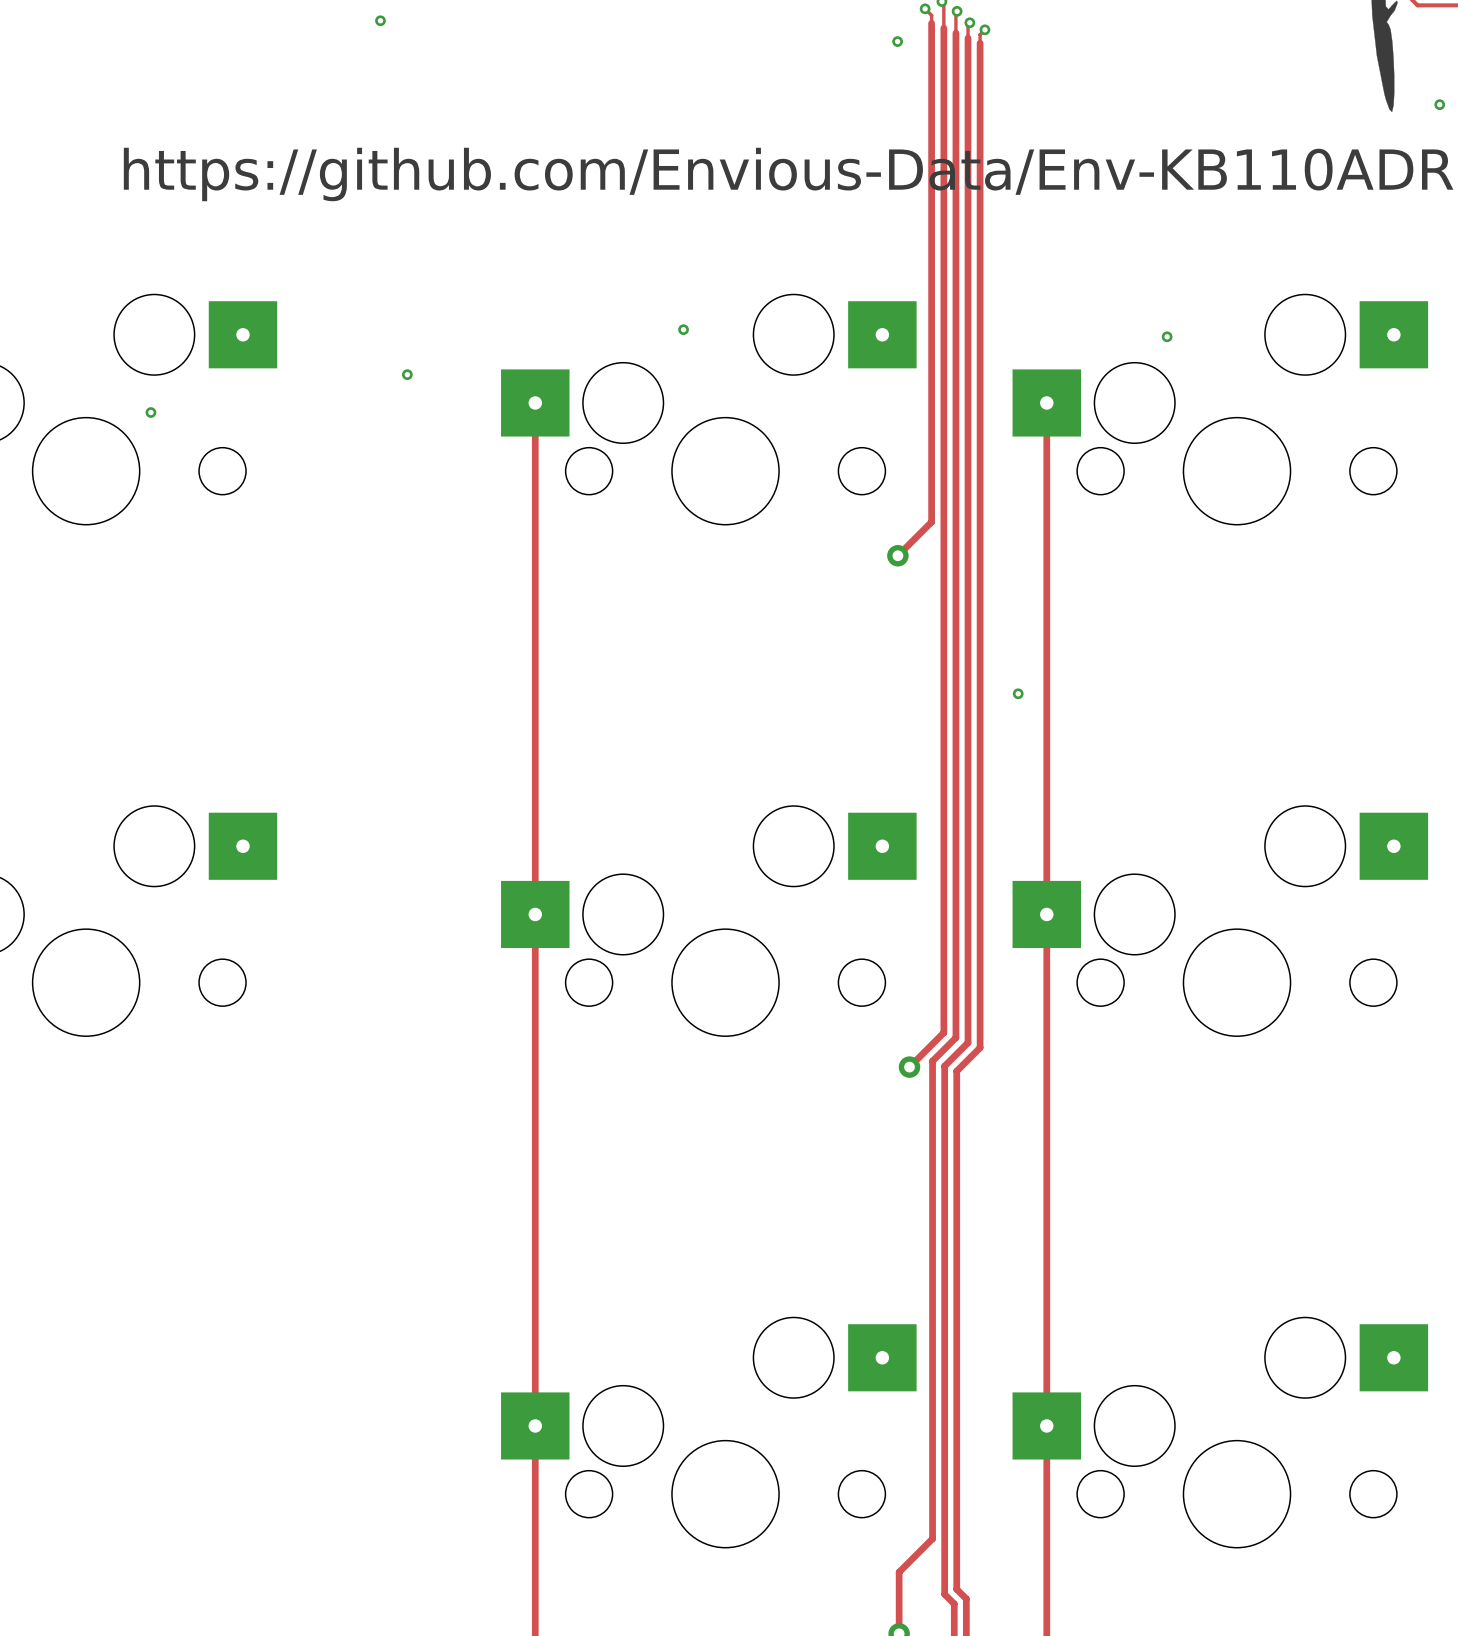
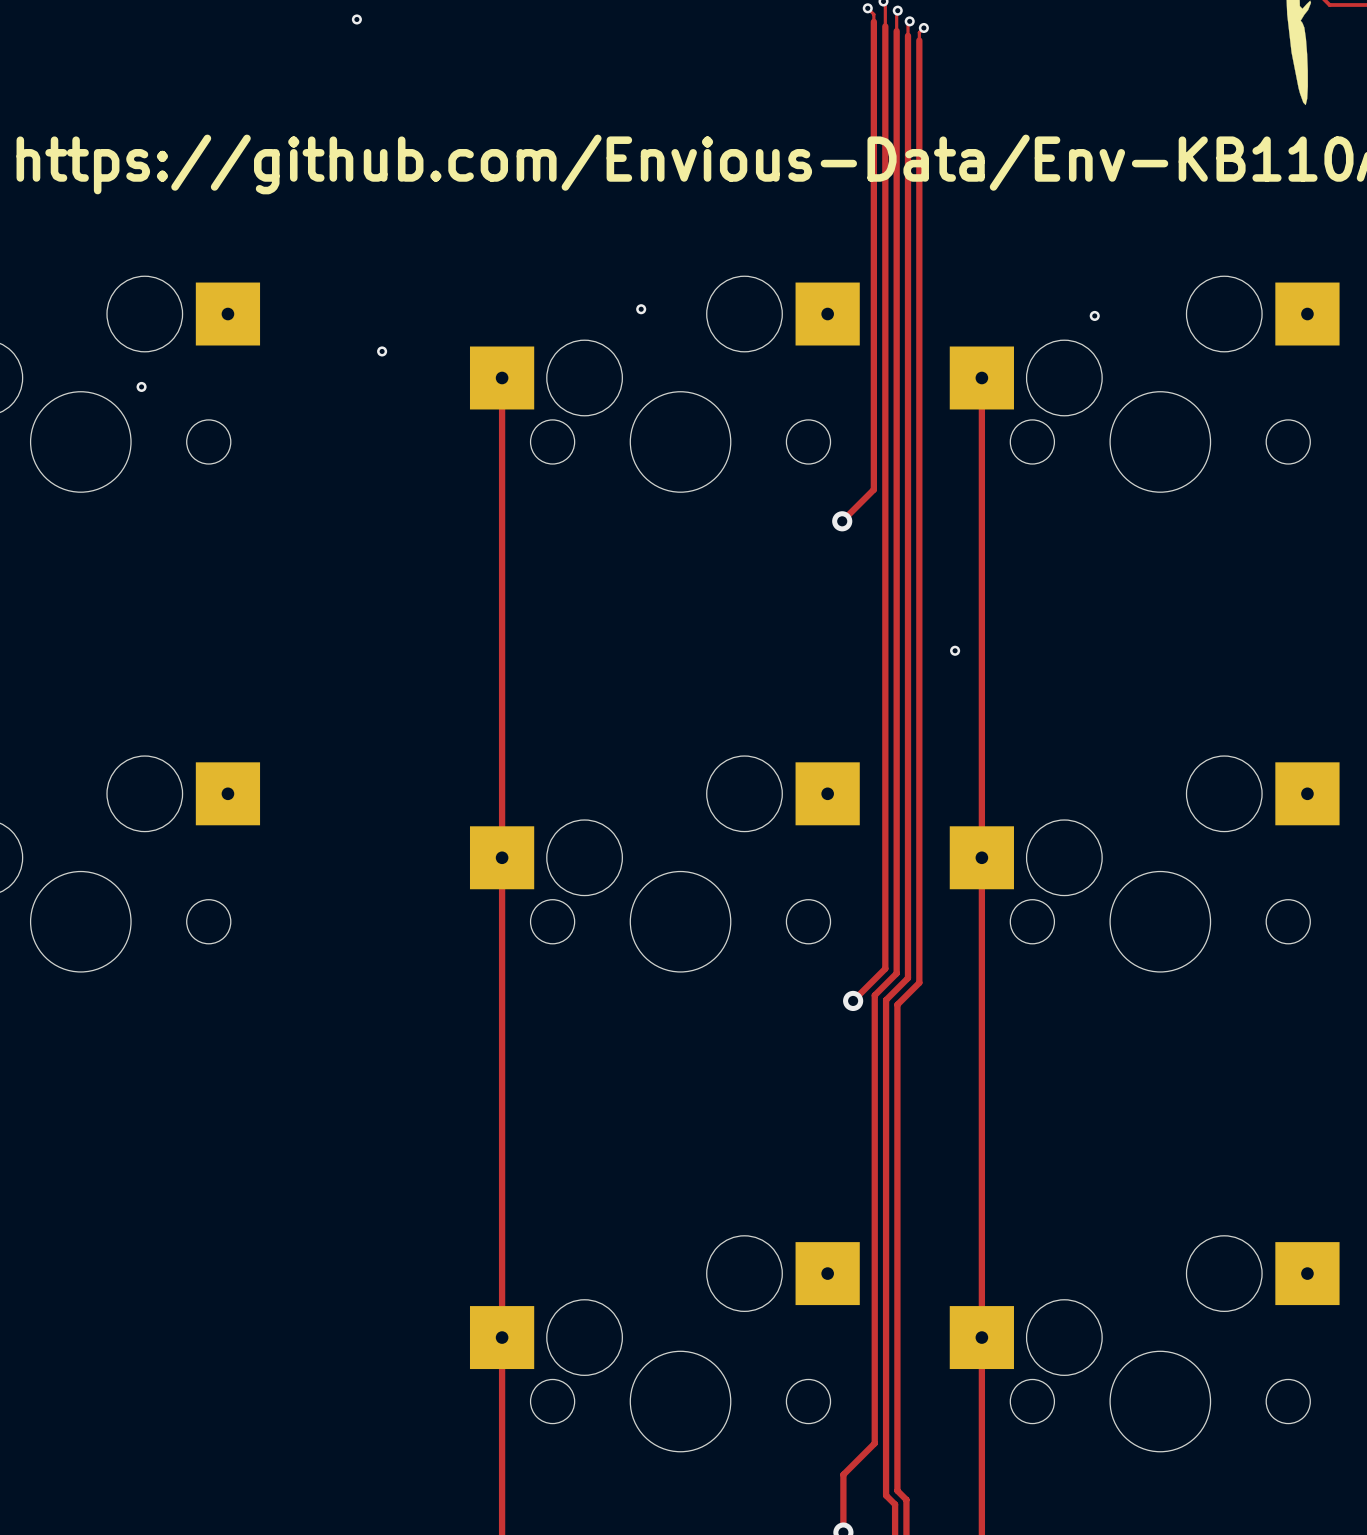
via: (897, 41) -> none
via: (1439, 104) -> none

